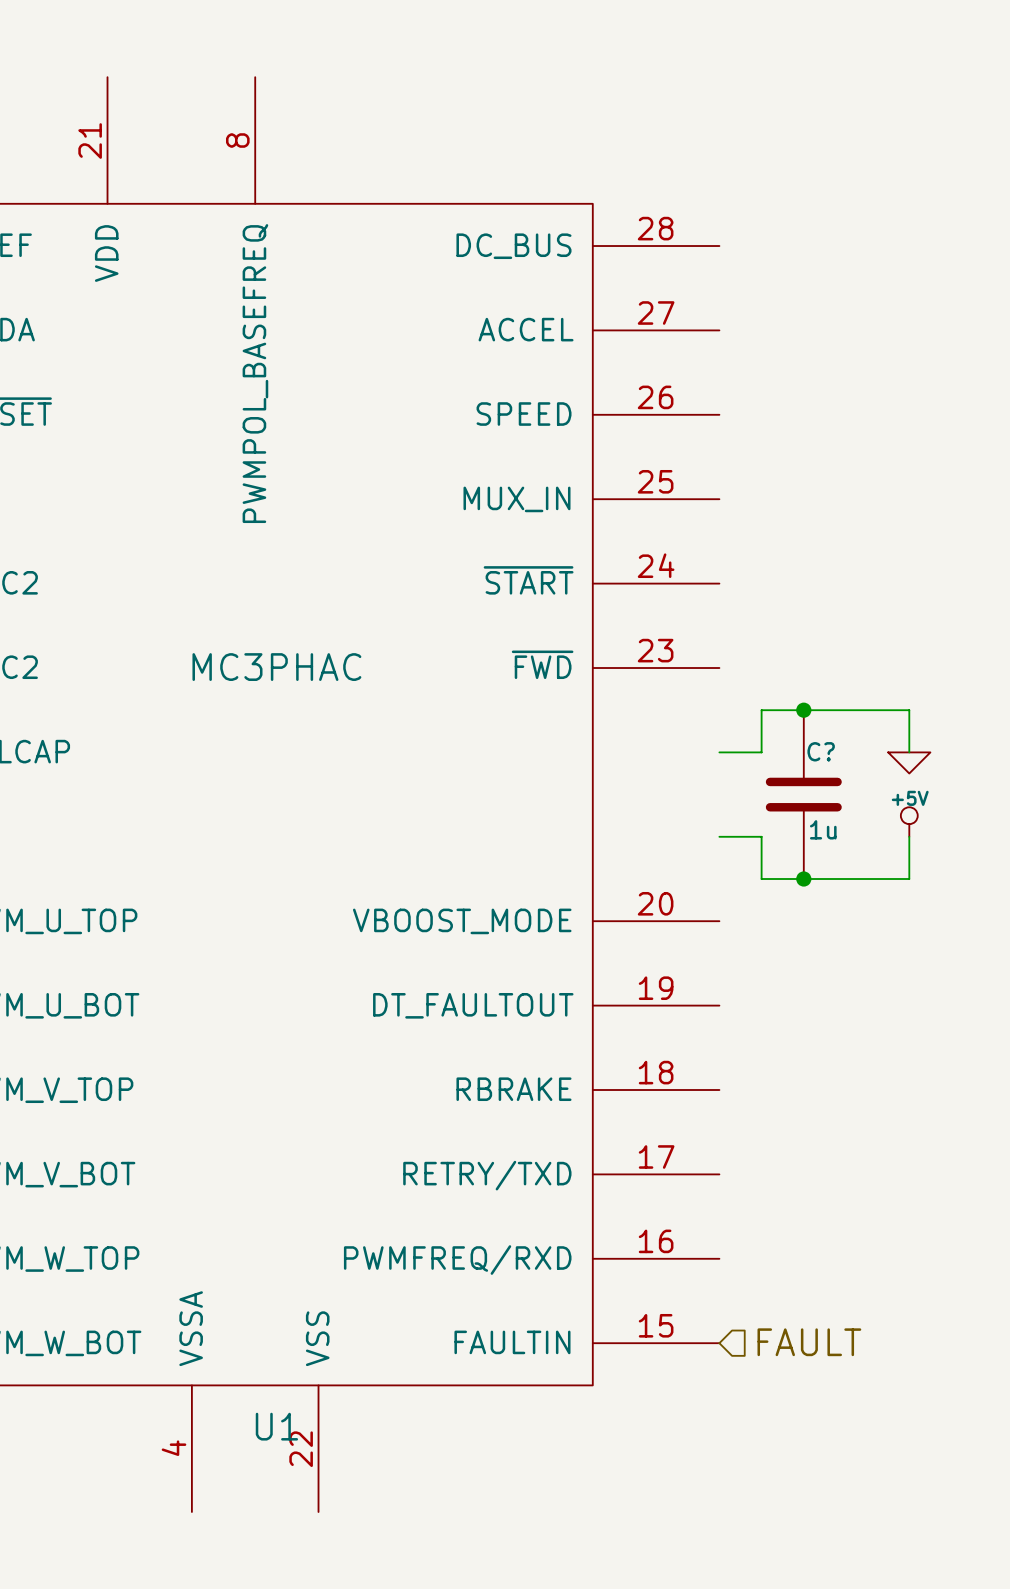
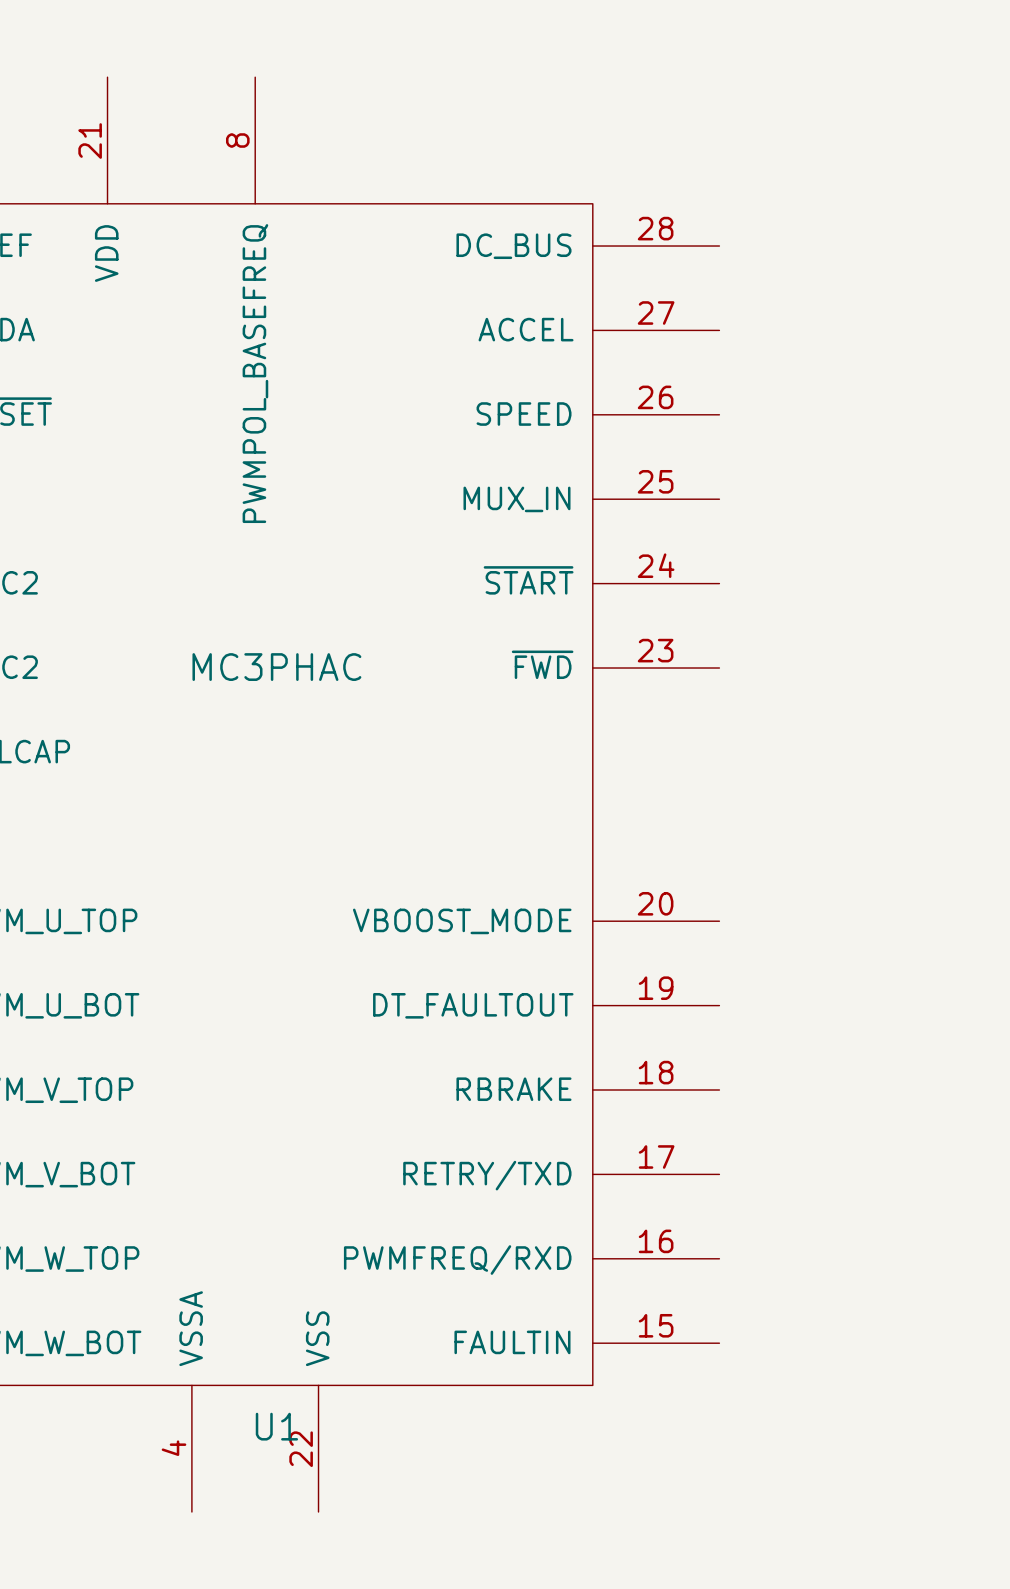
junction: (803, 710) -> none
wire: (719, 752) (761, 752) (761, 710) (909, 710) (909, 752) -> none
power symbol: (909, 762) -> none
C?: 1u (803, 794) -> none
power symbol: +5V (909, 822) -> none
wire: (719, 836) (761, 836) (761, 879) (909, 879) (909, 836) -> none
junction: (803, 879) -> none
hierarchical label: FAULT (809, 1342) -> none

